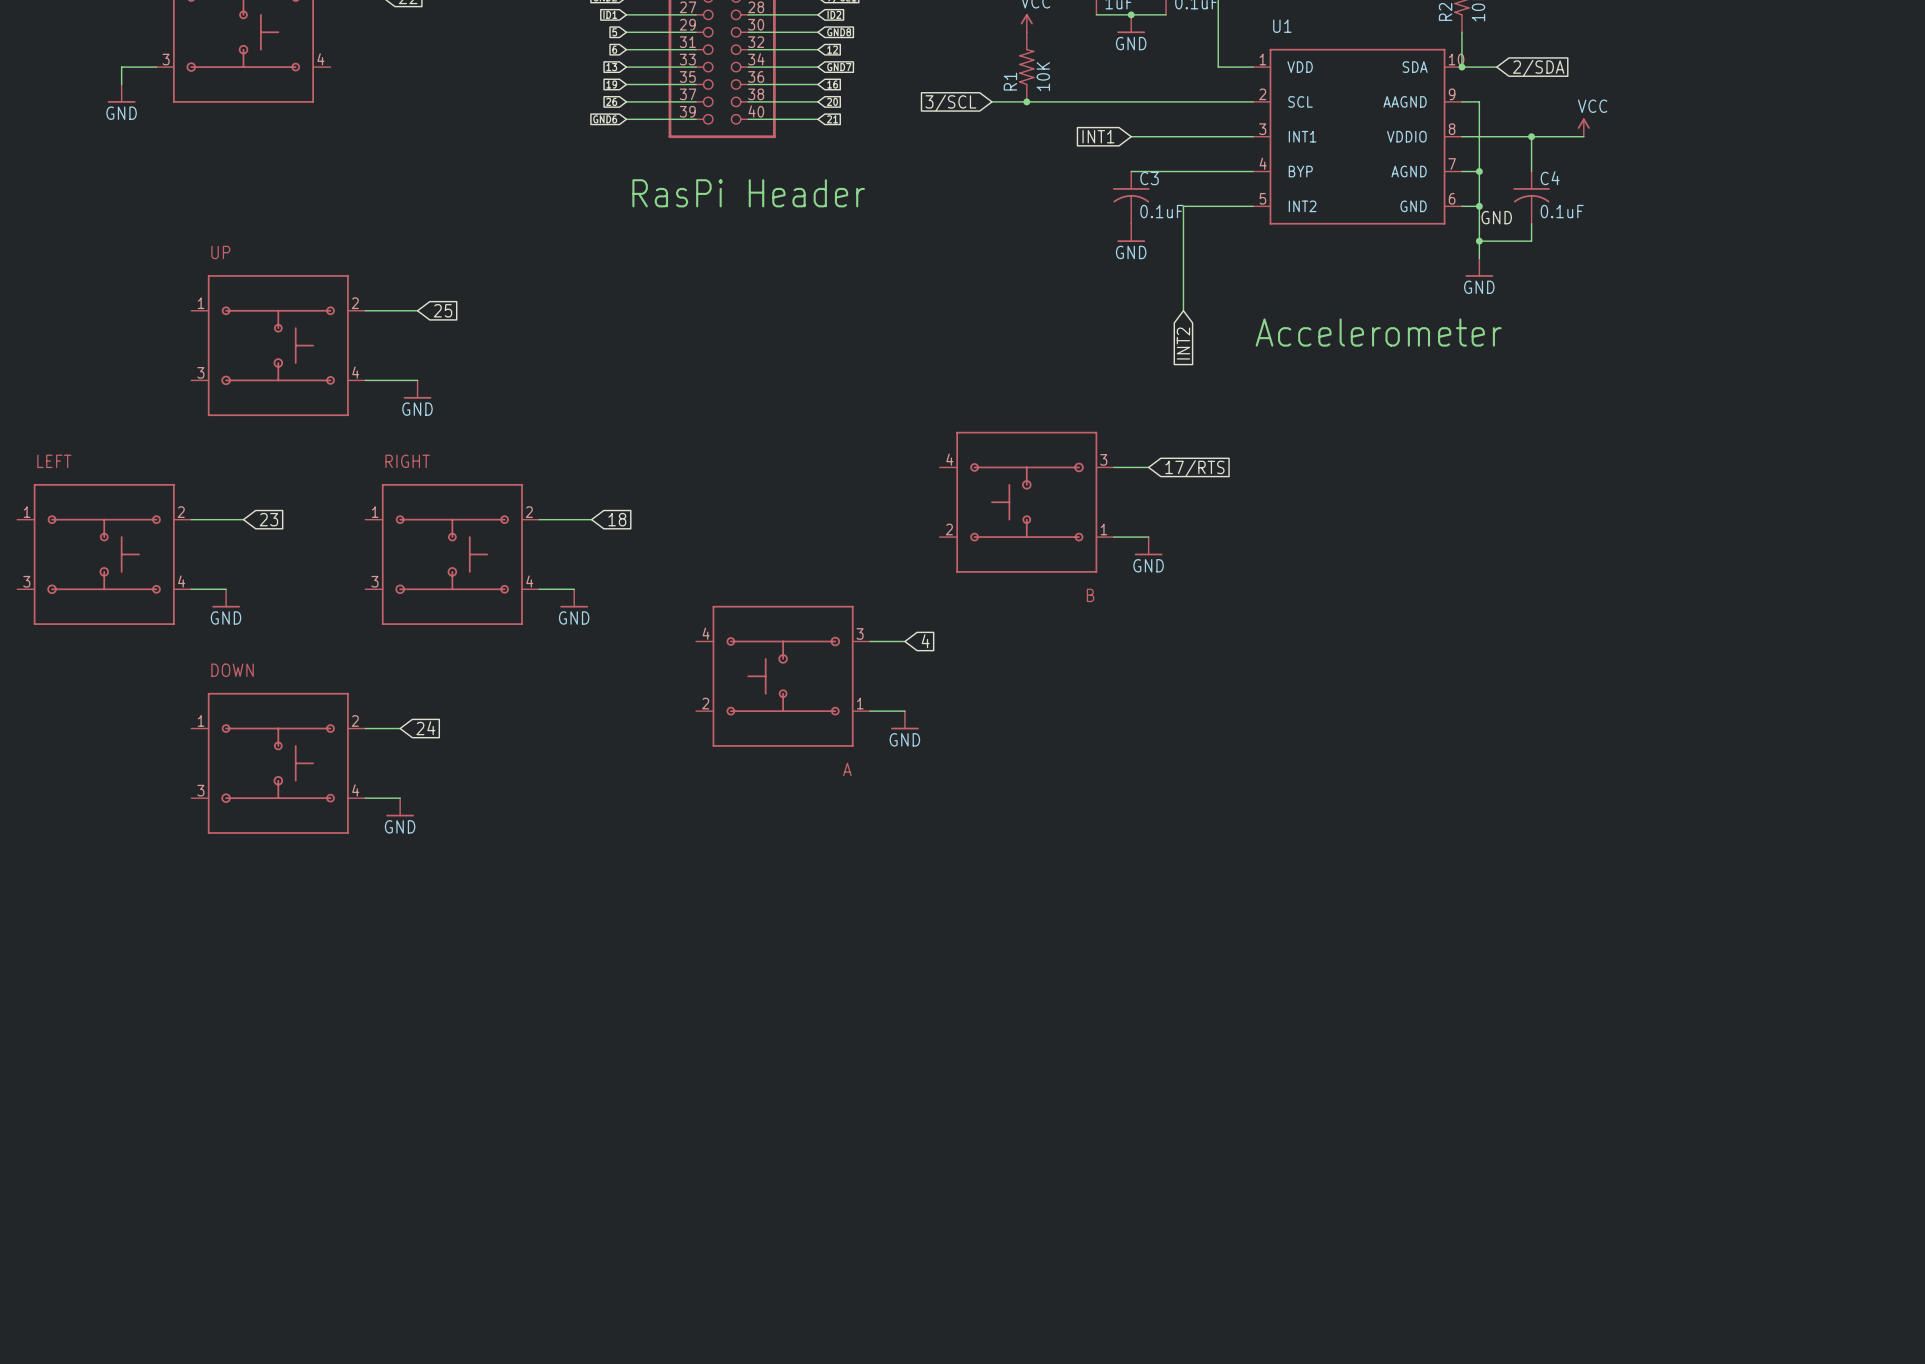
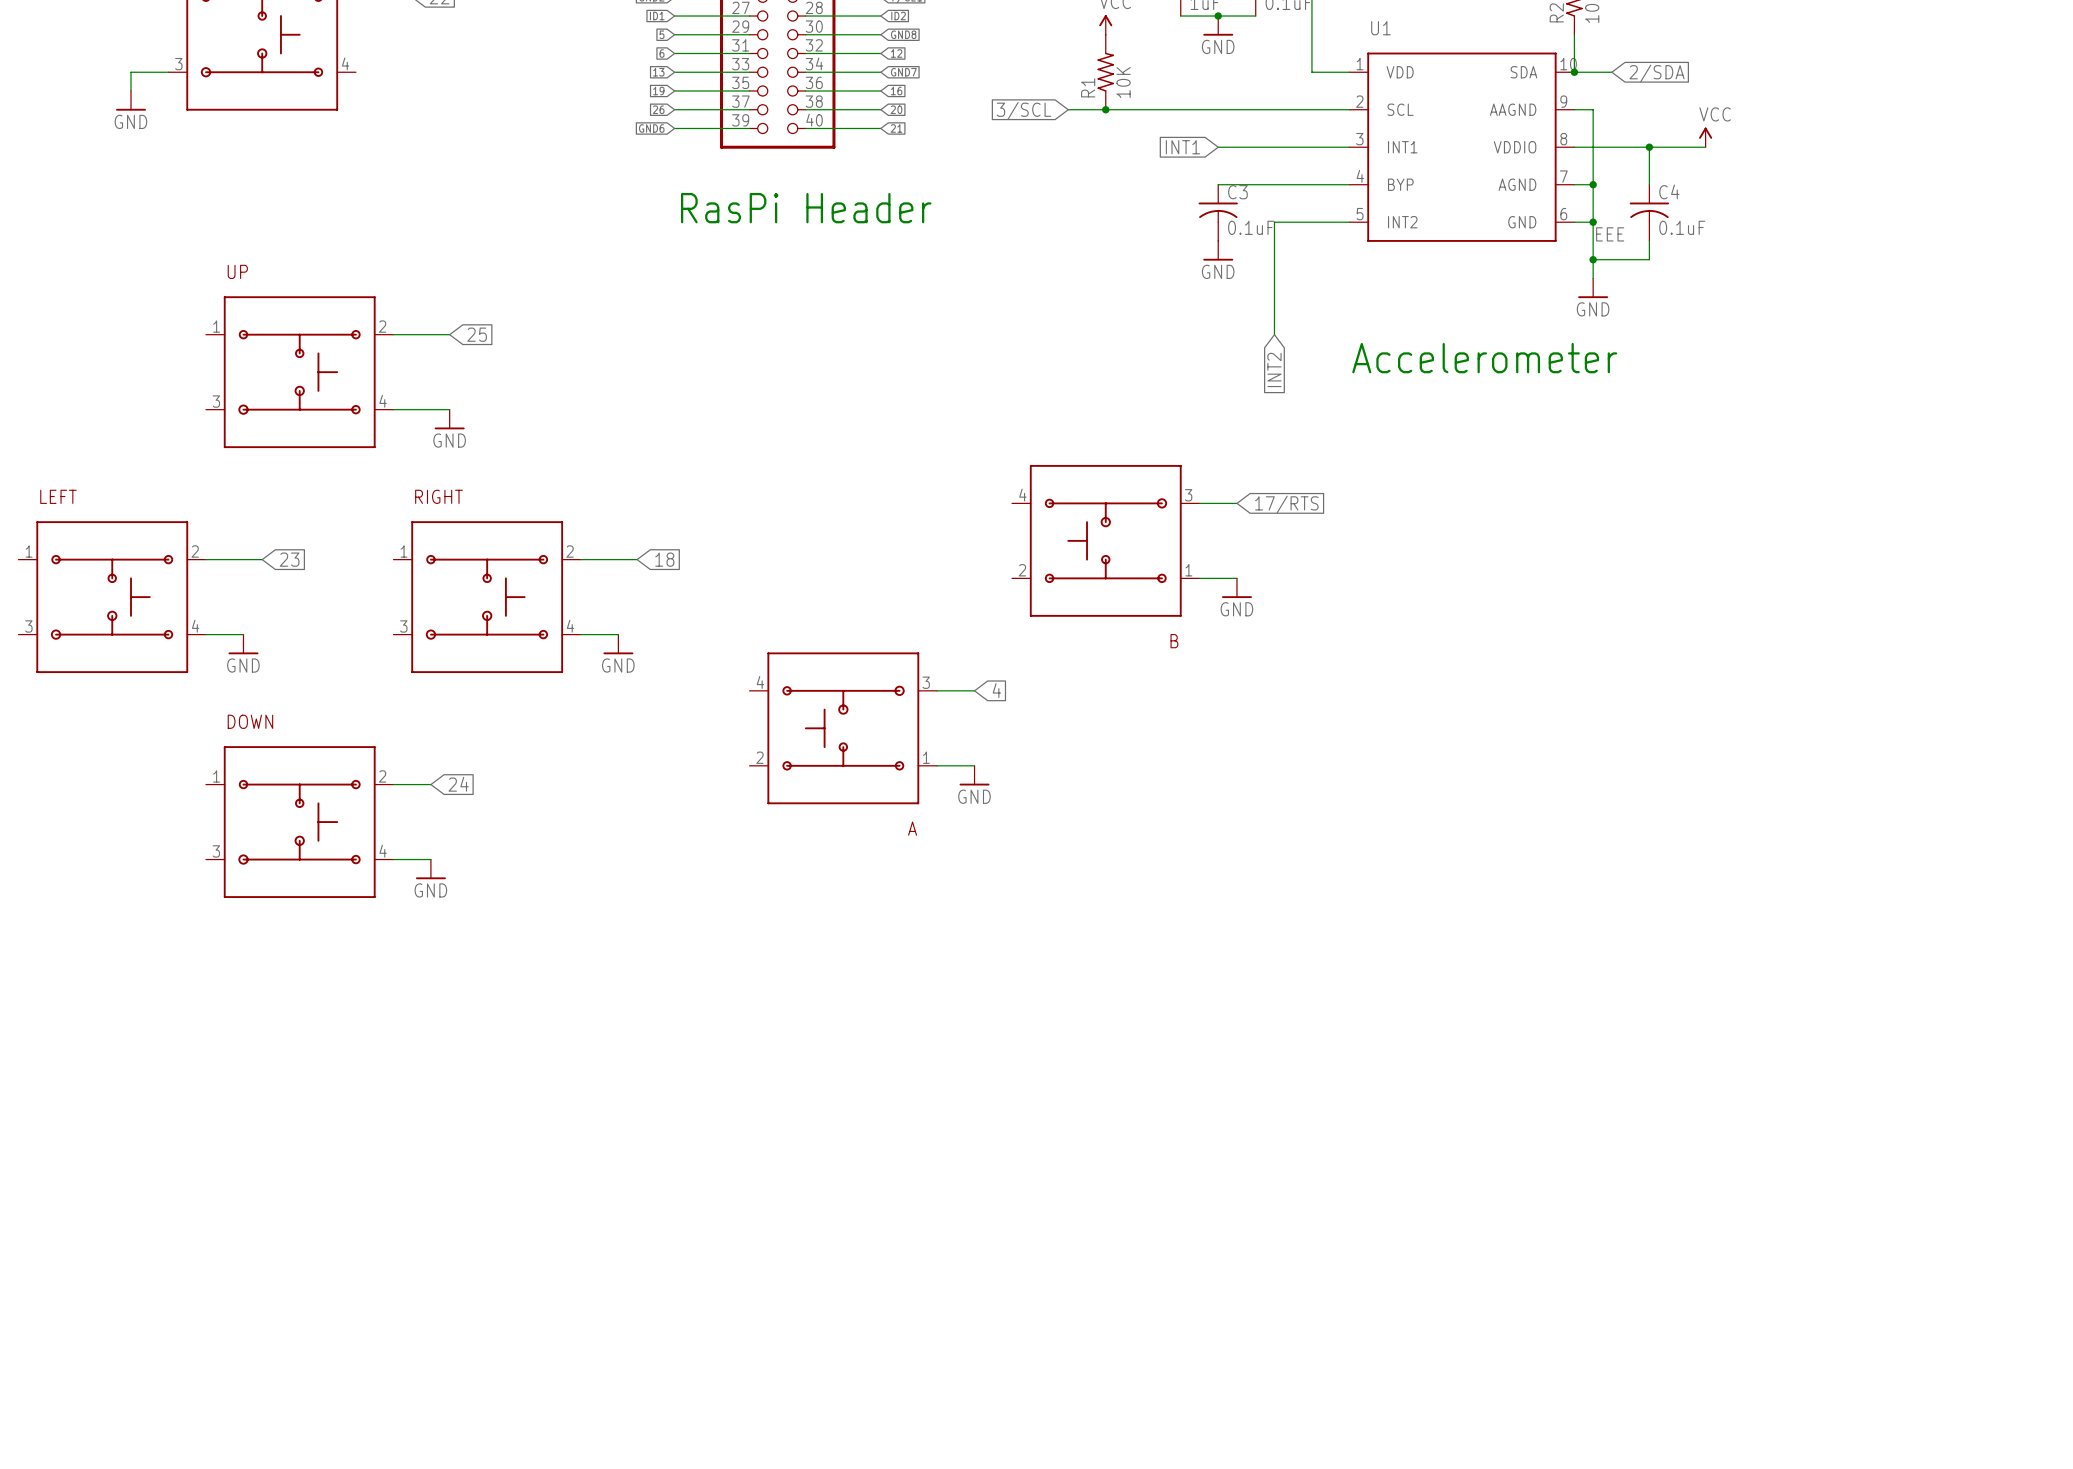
label: GND (1496, 217) -> EEE (1610, 234)

